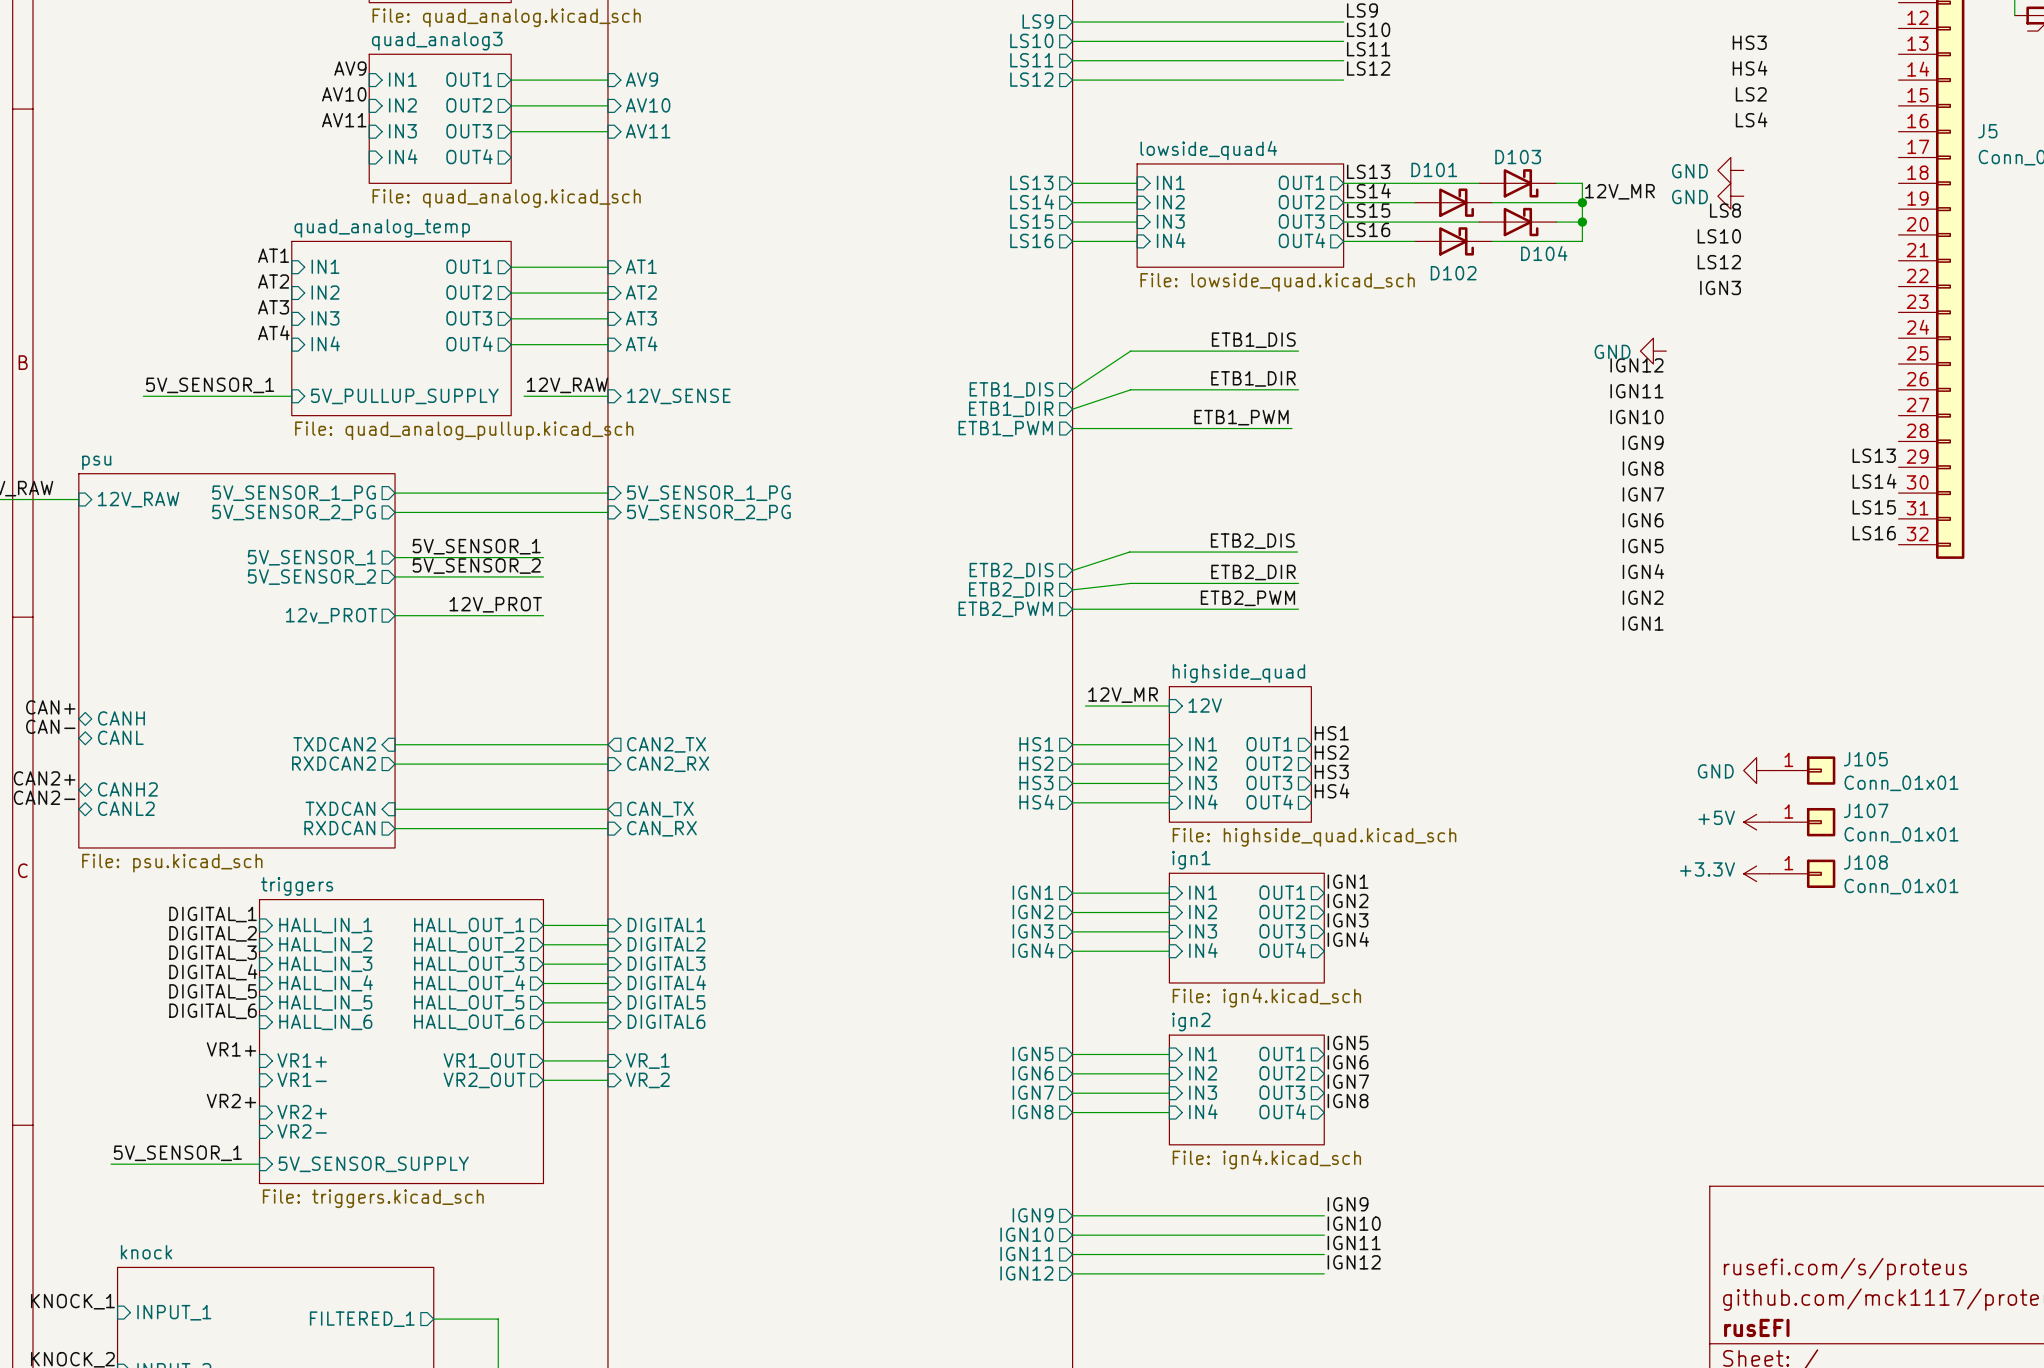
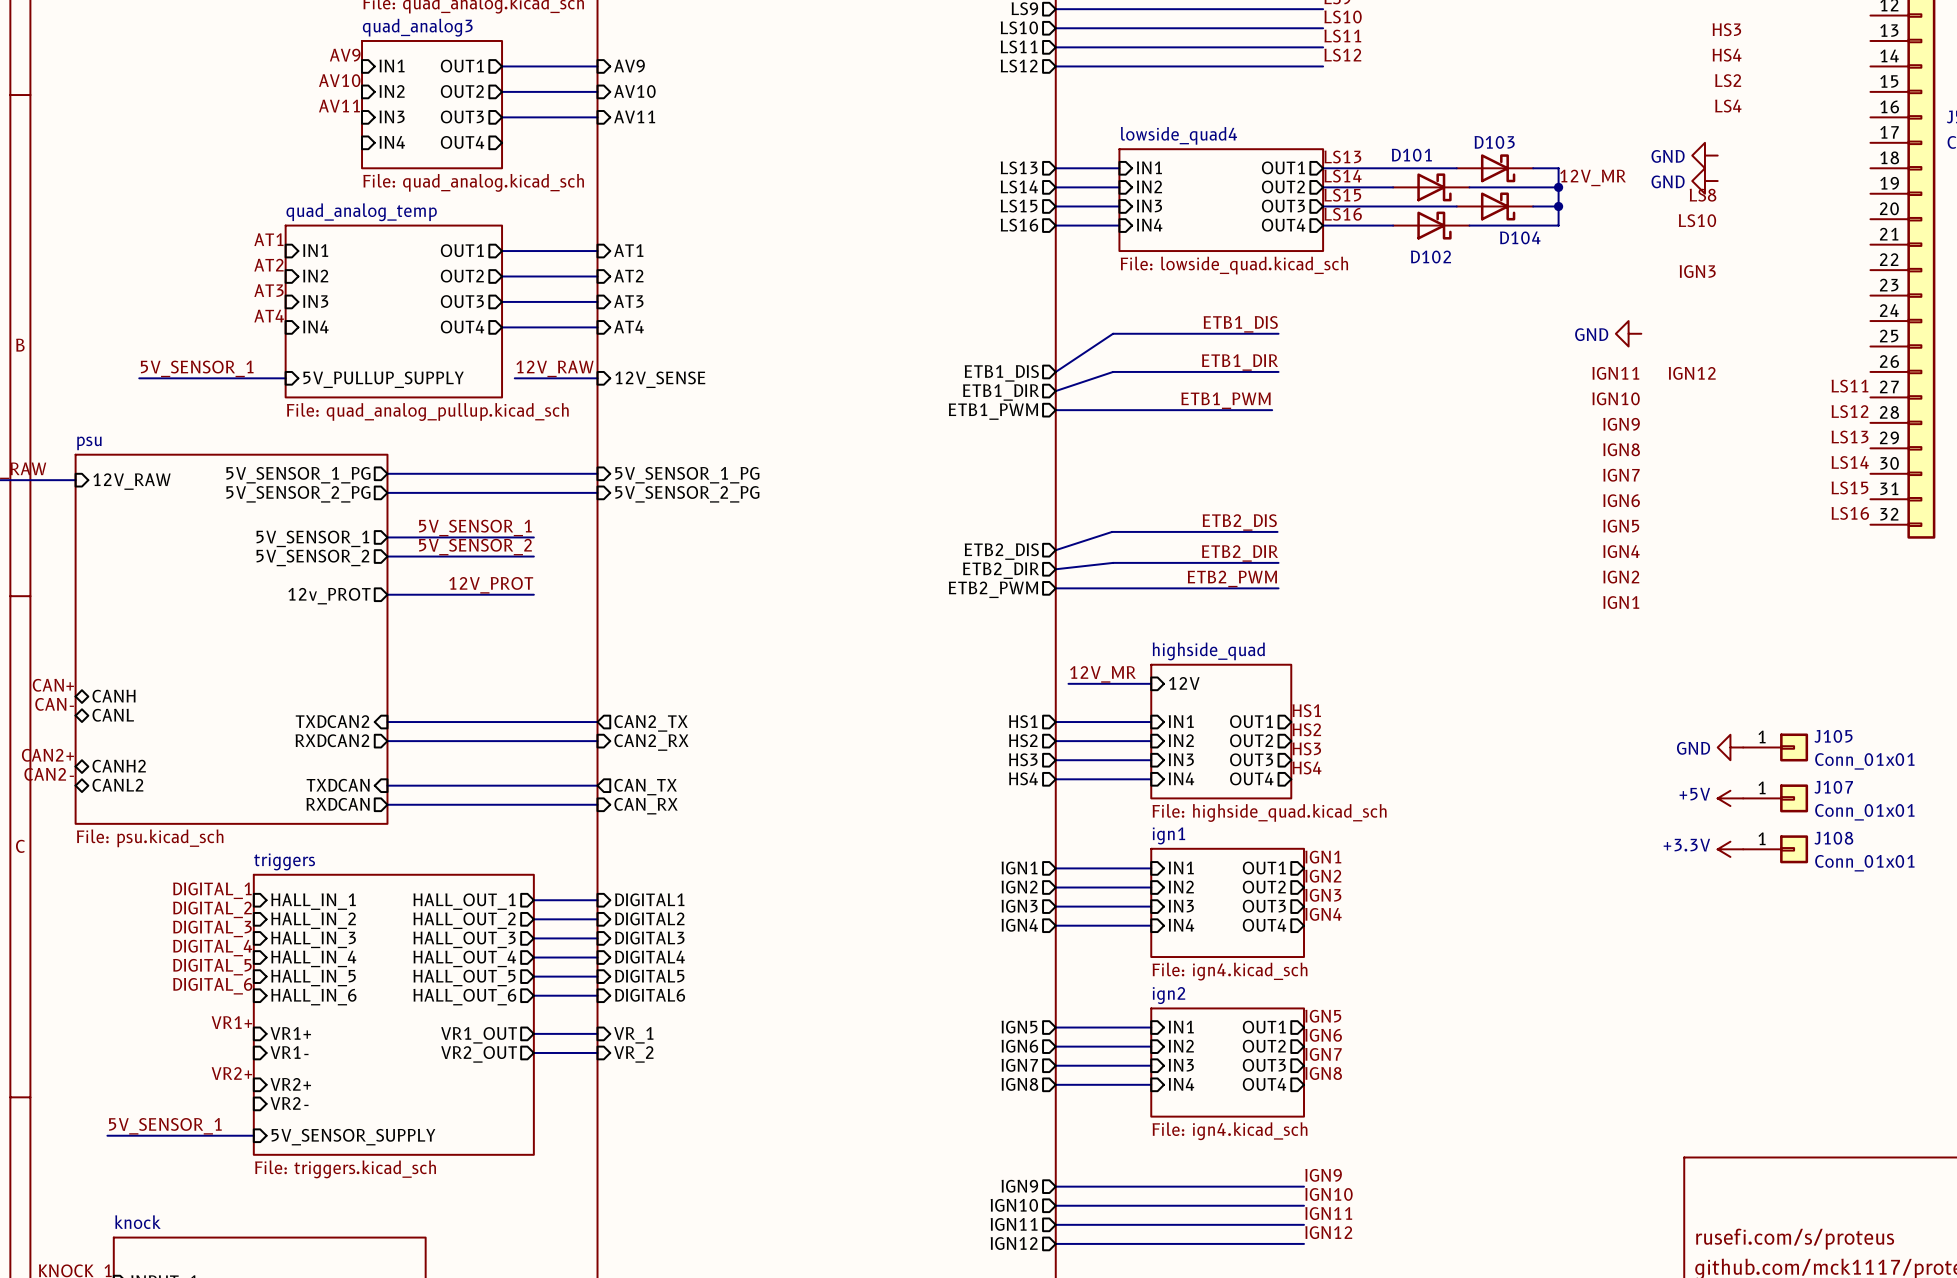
label position: LS12 (1719, 262) -> LS12 (1850, 411)
label position: IGN12 (1636, 365) -> IGN12 (1692, 373)
label: none -> LS11 (1849, 386)

